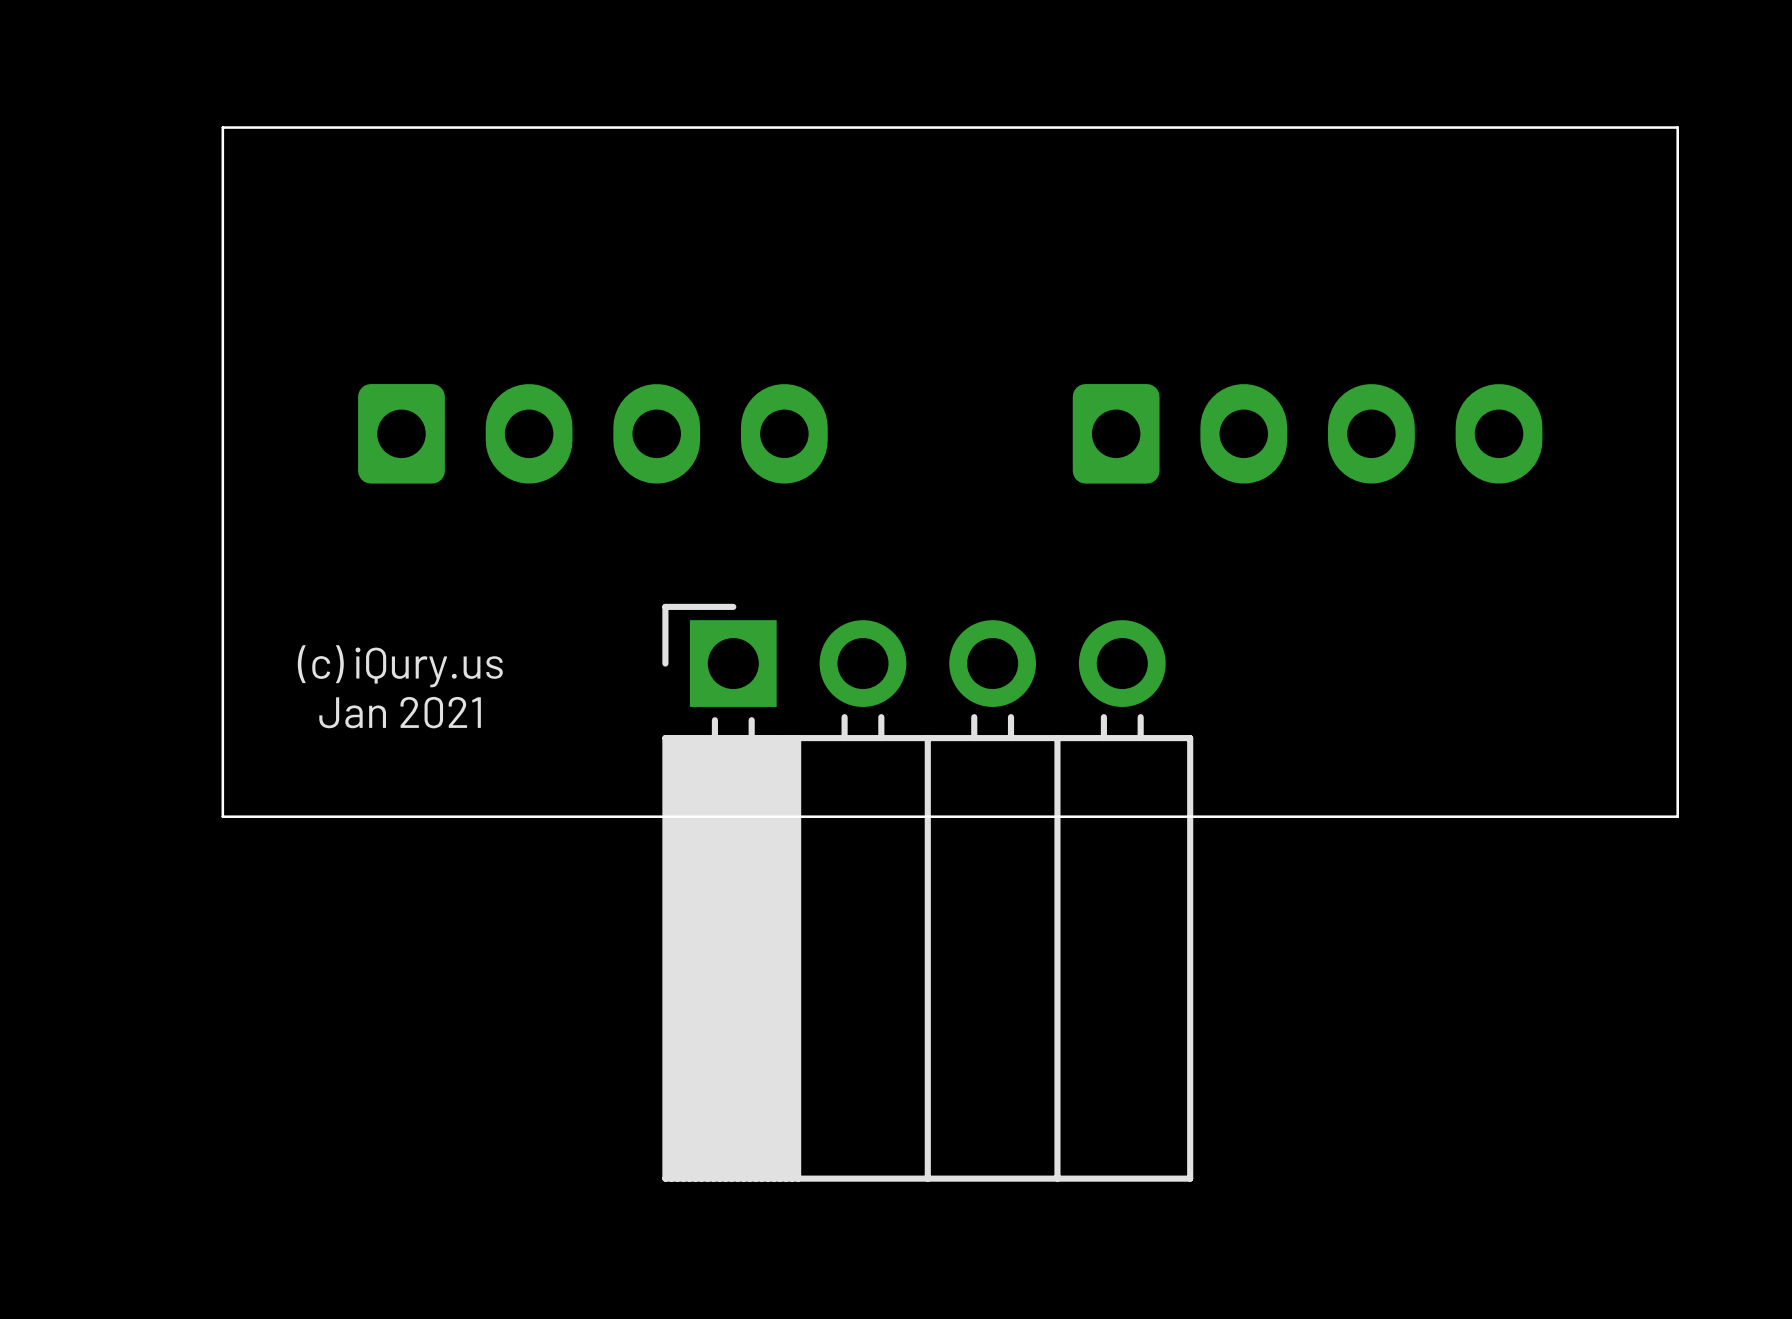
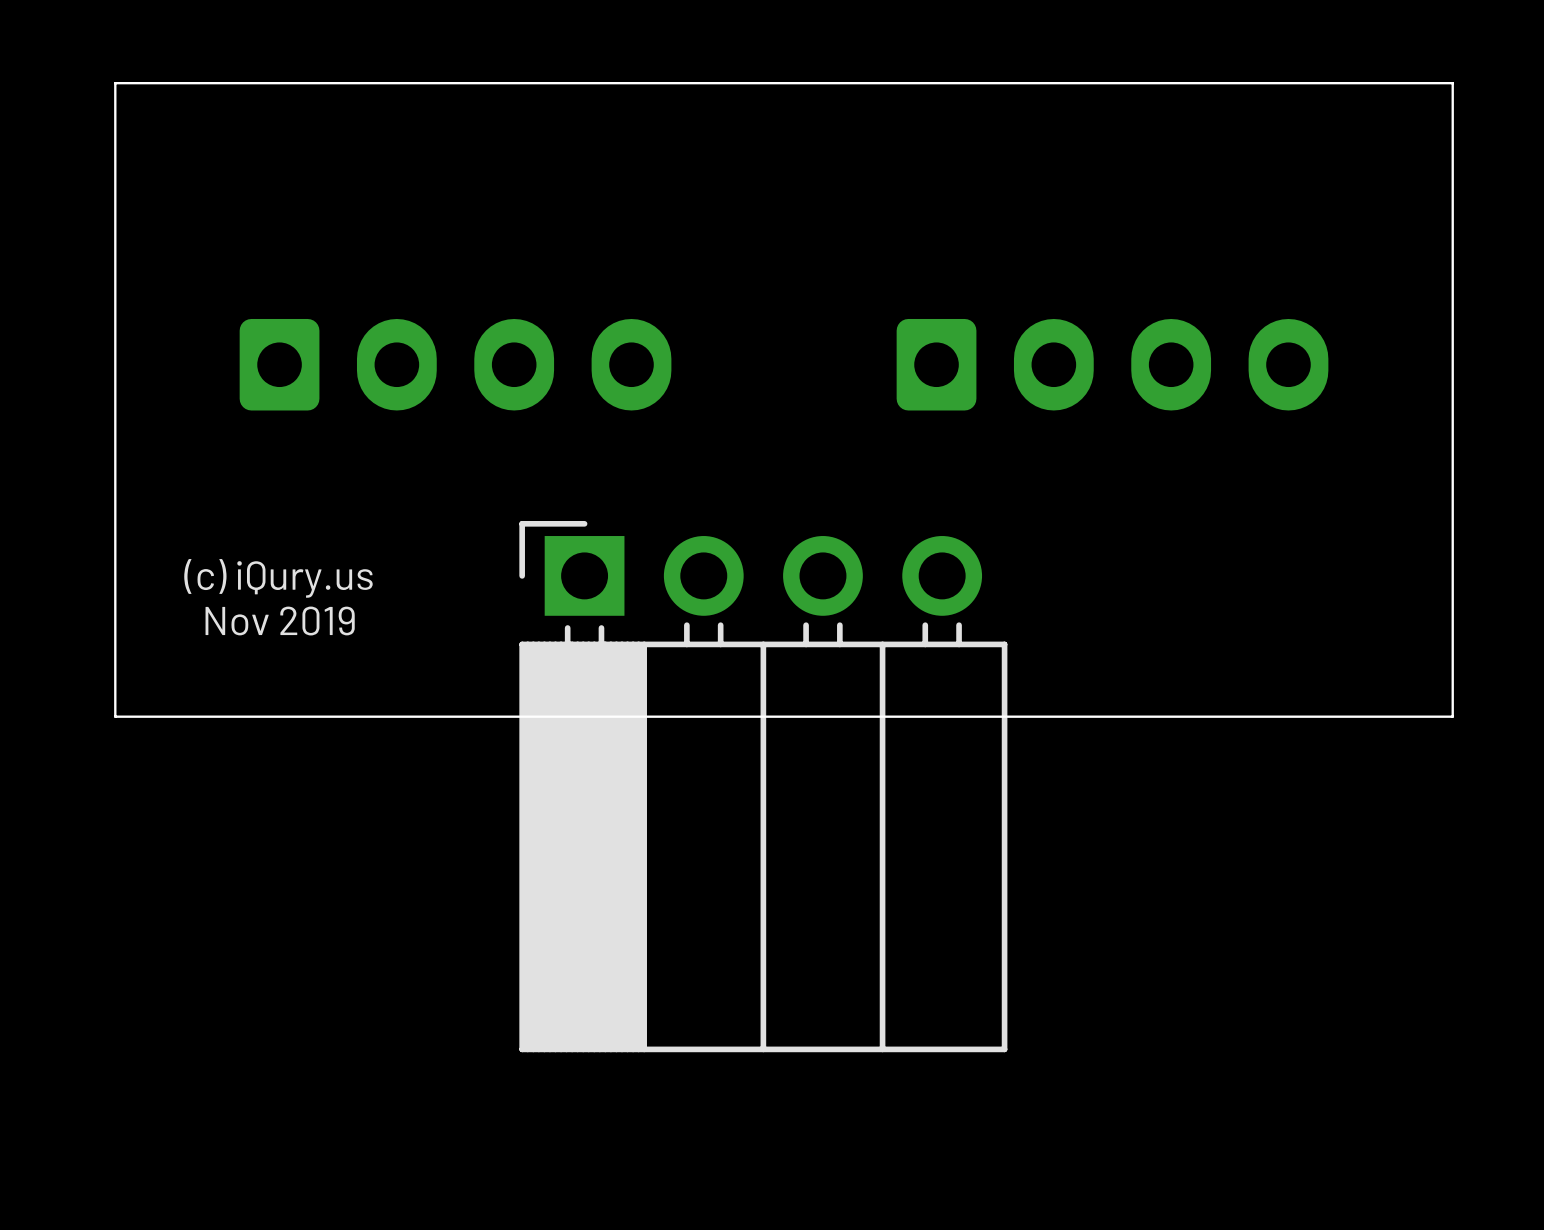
text: Jan 2021 (400, 712) -> Nov 2019 (280, 621)

